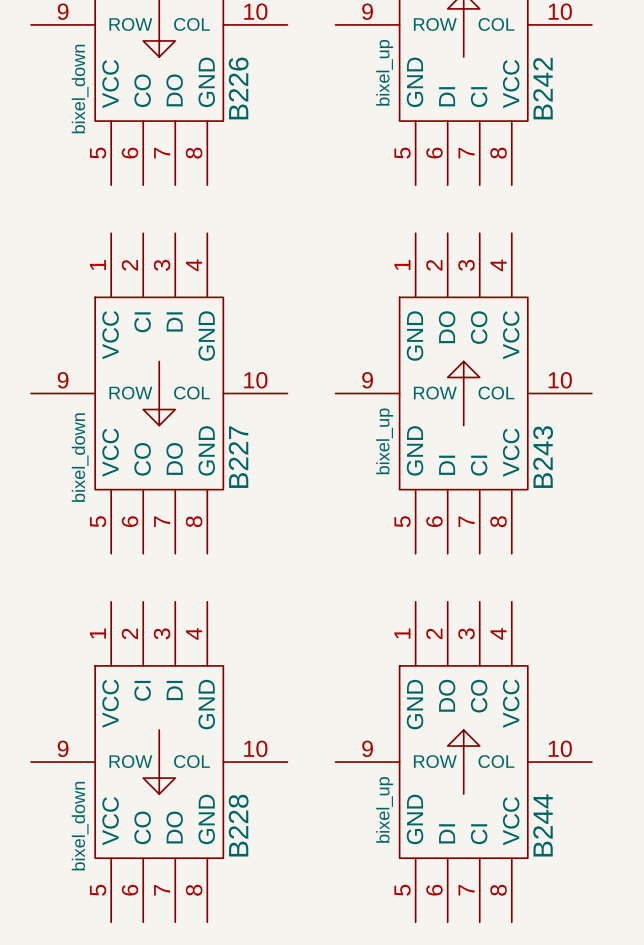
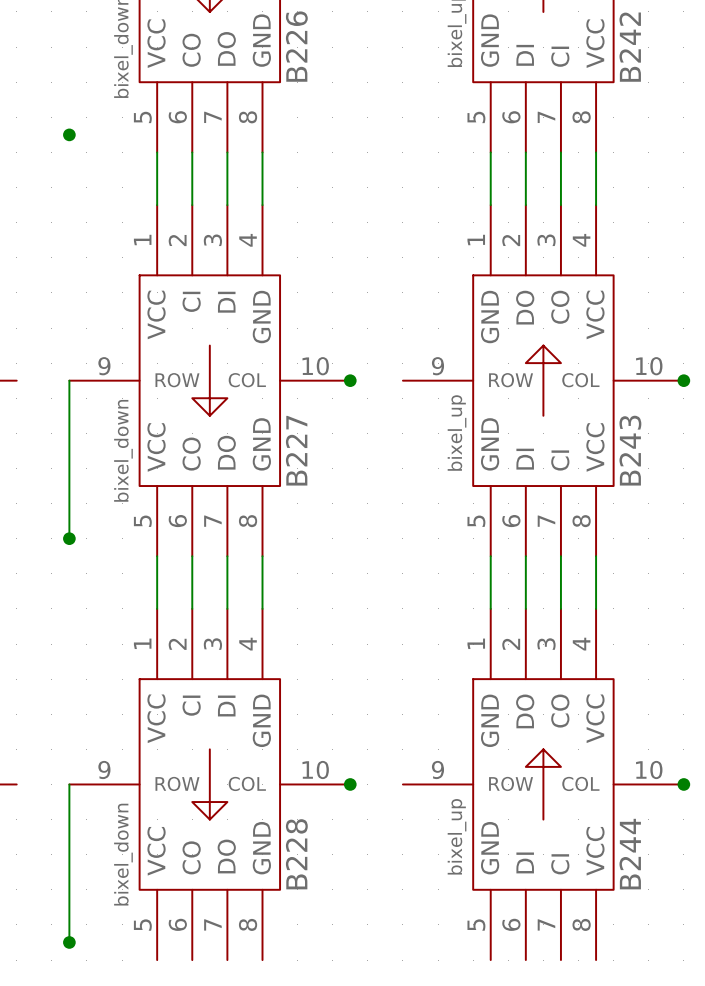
junction: none -> (69, 134)
wire: none -> (157, 152) (157, 205)
wire: none -> (192, 152) (192, 205)
wire: none -> (227, 152) (227, 205)
wire: none -> (262, 152) (262, 205)
wire: none -> (490, 152) (490, 205)
wire: none -> (525, 152) (525, 205)
wire: none -> (560, 152) (560, 205)
wire: none -> (596, 152) (596, 205)
wire: none -> (69, 380) (69, 538)
junction: none -> (350, 380)
junction: none -> (683, 380)
junction: none -> (69, 538)
wire: none -> (157, 556) (157, 608)
wire: none -> (192, 556) (192, 608)
wire: none -> (227, 556) (227, 608)
wire: none -> (262, 556) (262, 608)
wire: none -> (490, 556) (490, 608)
wire: none -> (525, 556) (525, 608)
wire: none -> (560, 556) (560, 608)
wire: none -> (596, 556) (596, 608)
wire: none -> (69, 784) (69, 942)
junction: none -> (350, 784)
junction: none -> (683, 784)
junction: none -> (69, 942)

